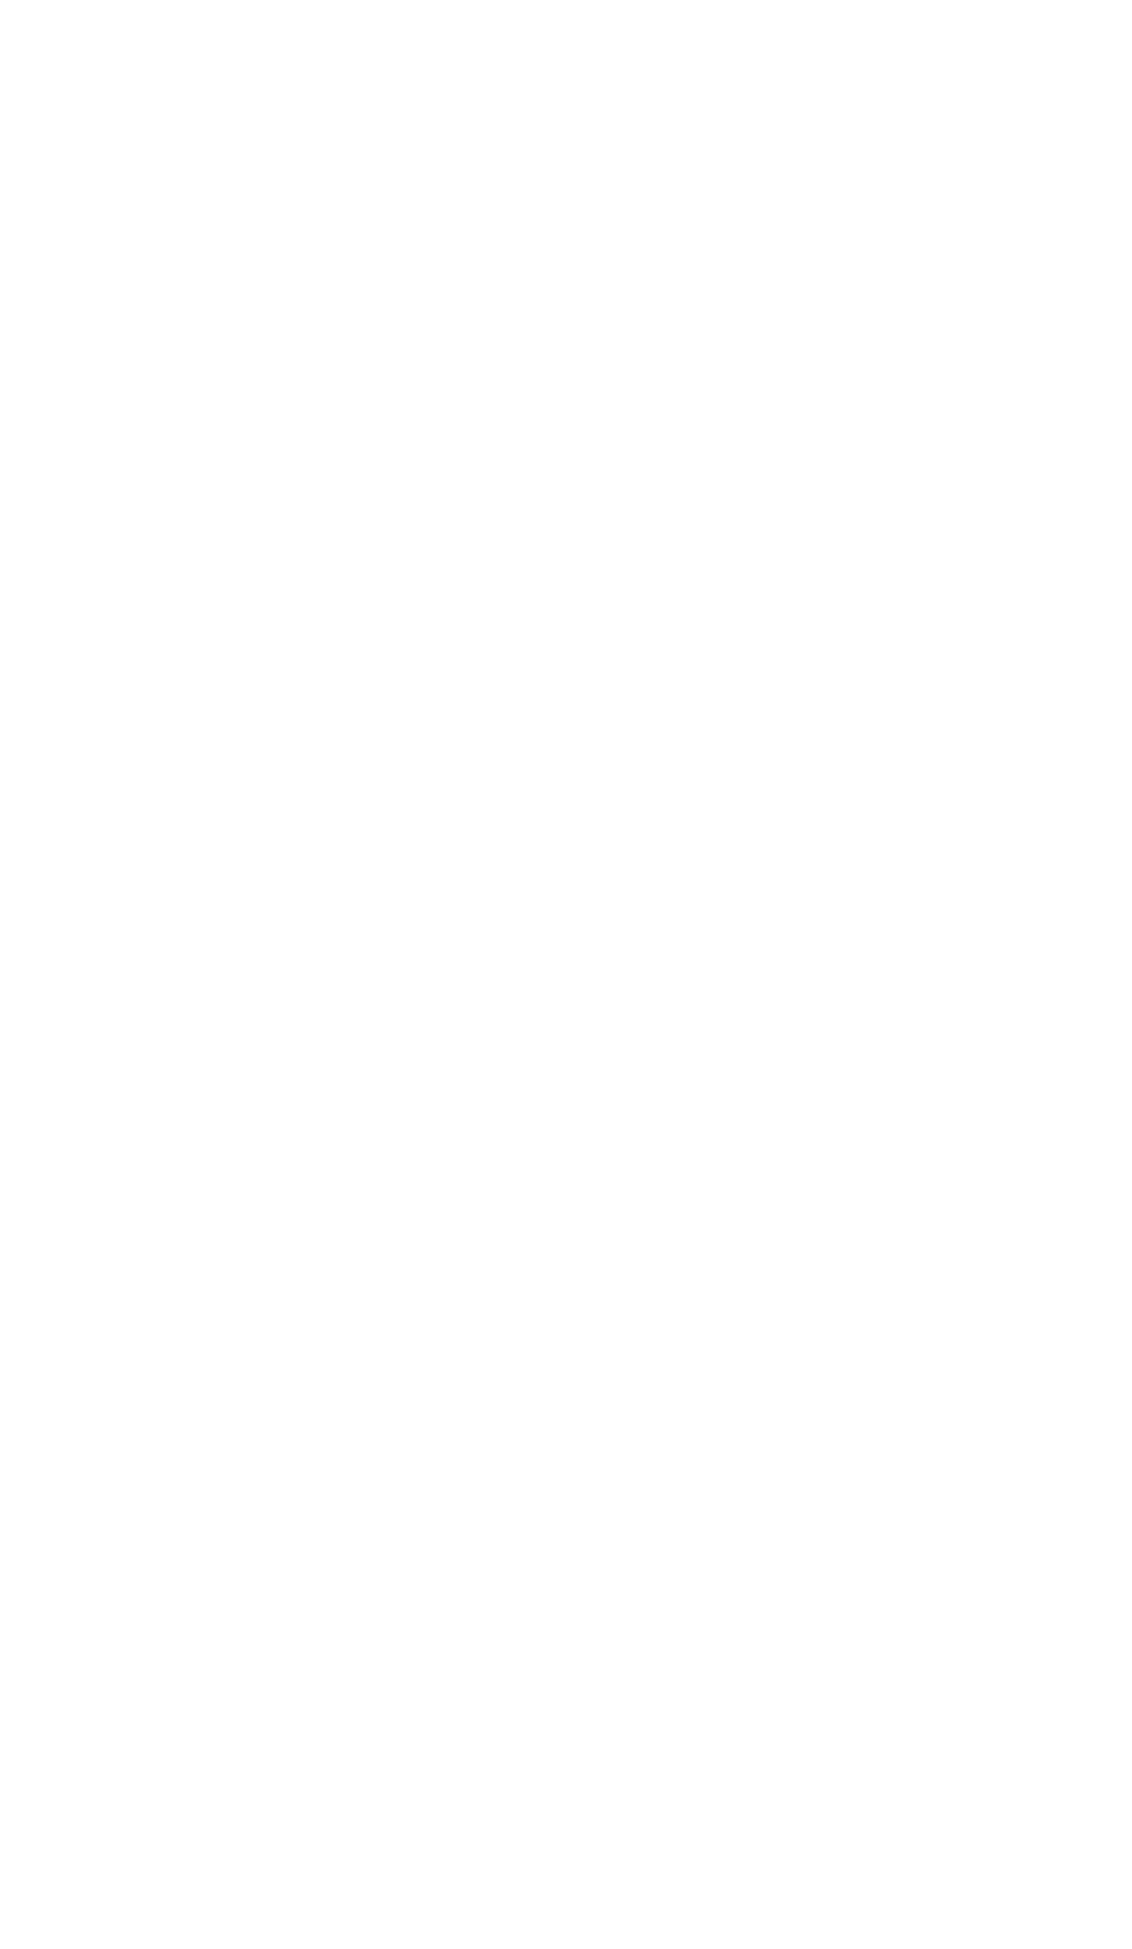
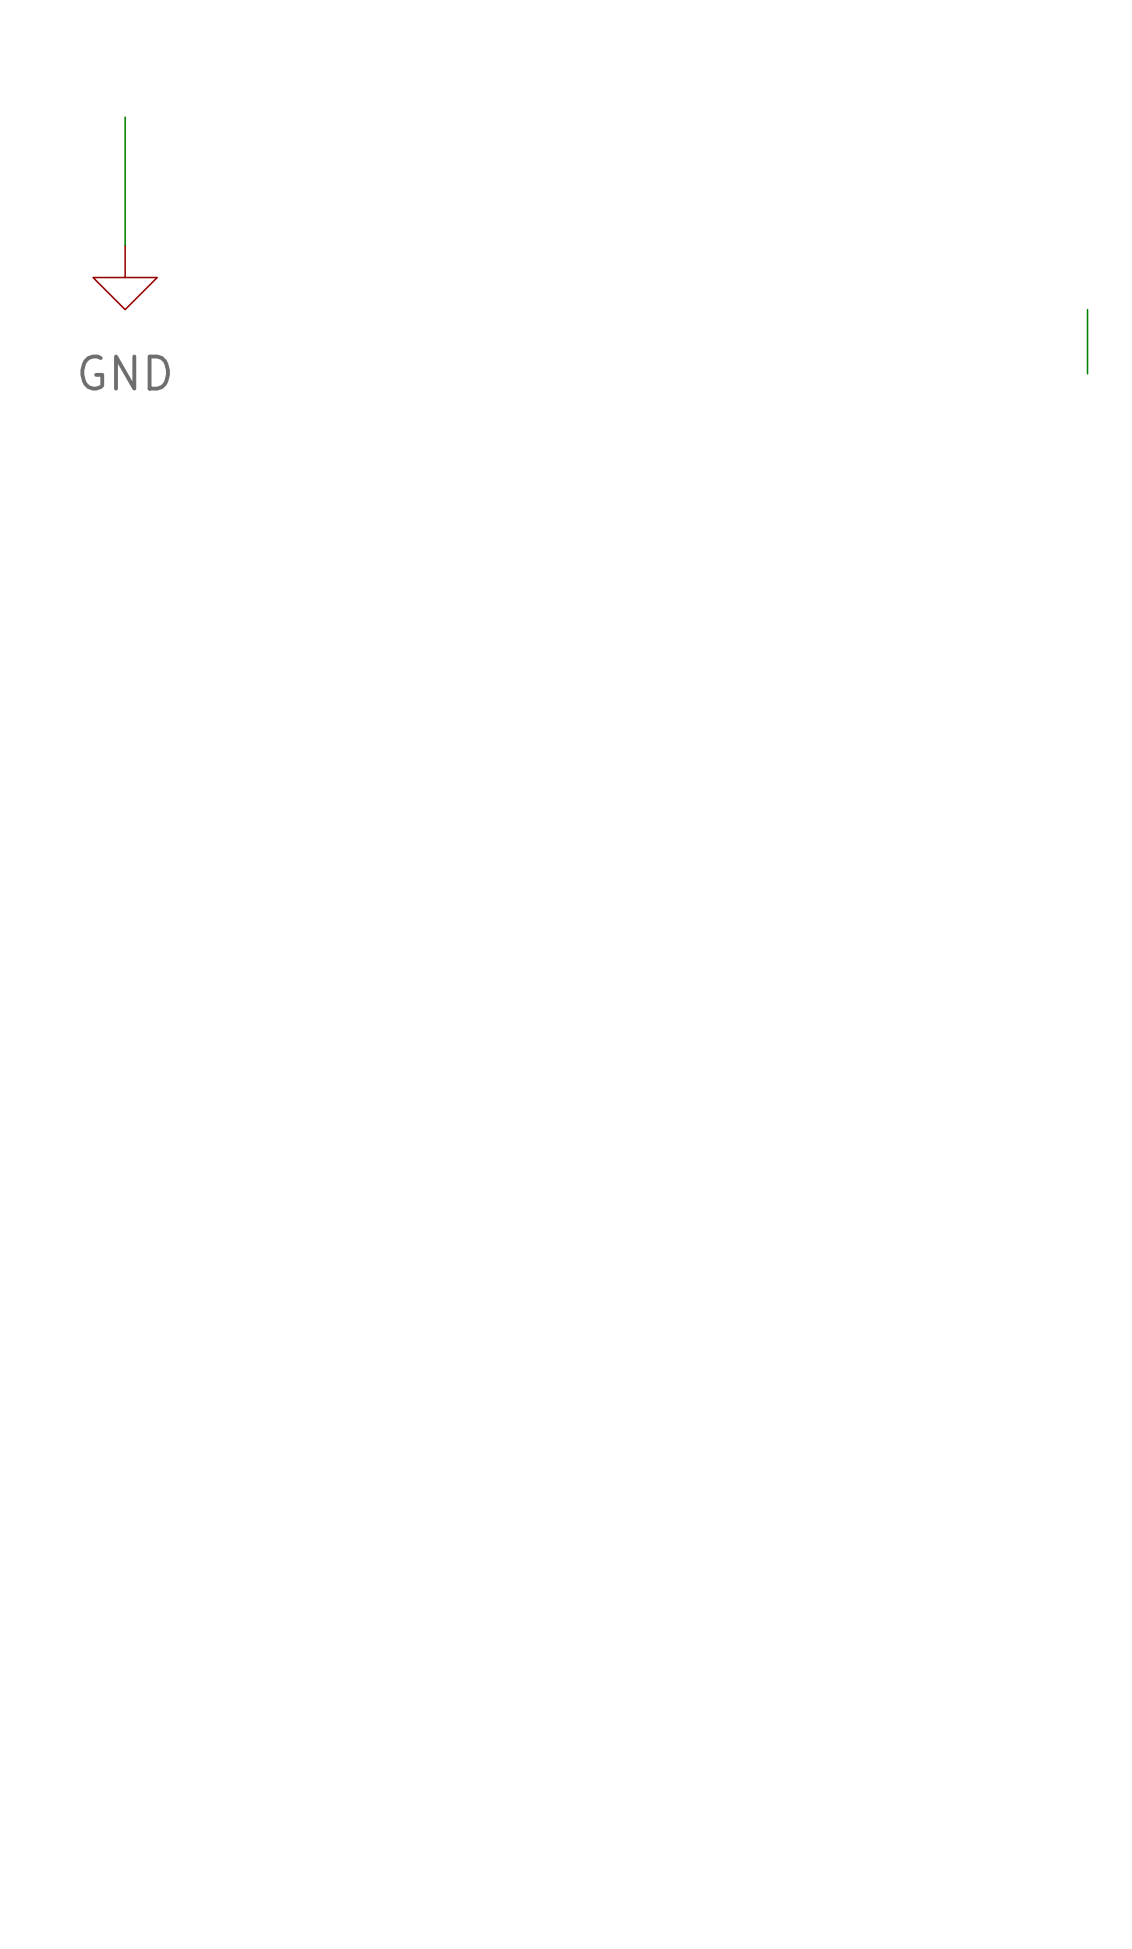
wire: none -> (125, 117) (125, 245)
power symbol: none -> GND (125, 277)
wire: none -> (1087, 309) (1087, 373)

